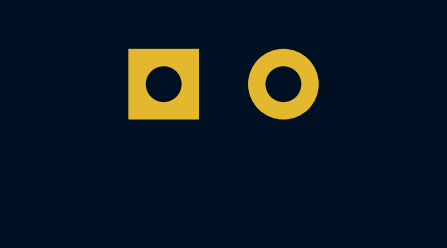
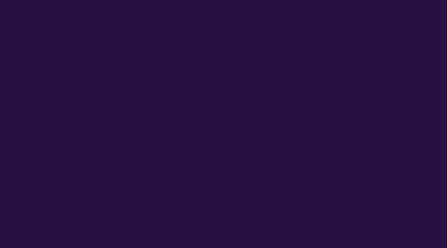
part: (223, 84) -> none

